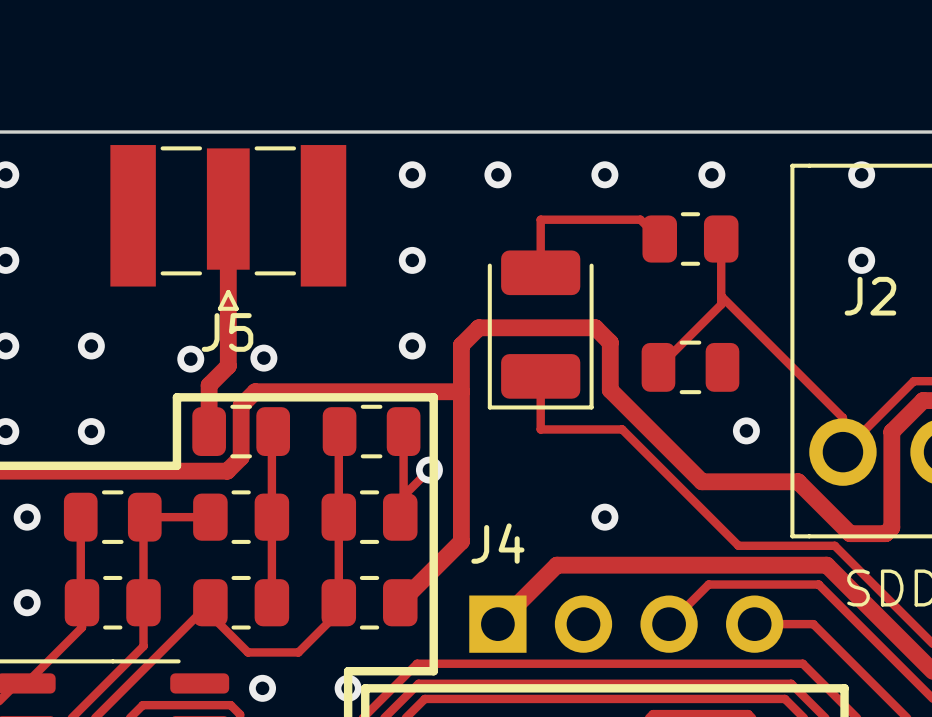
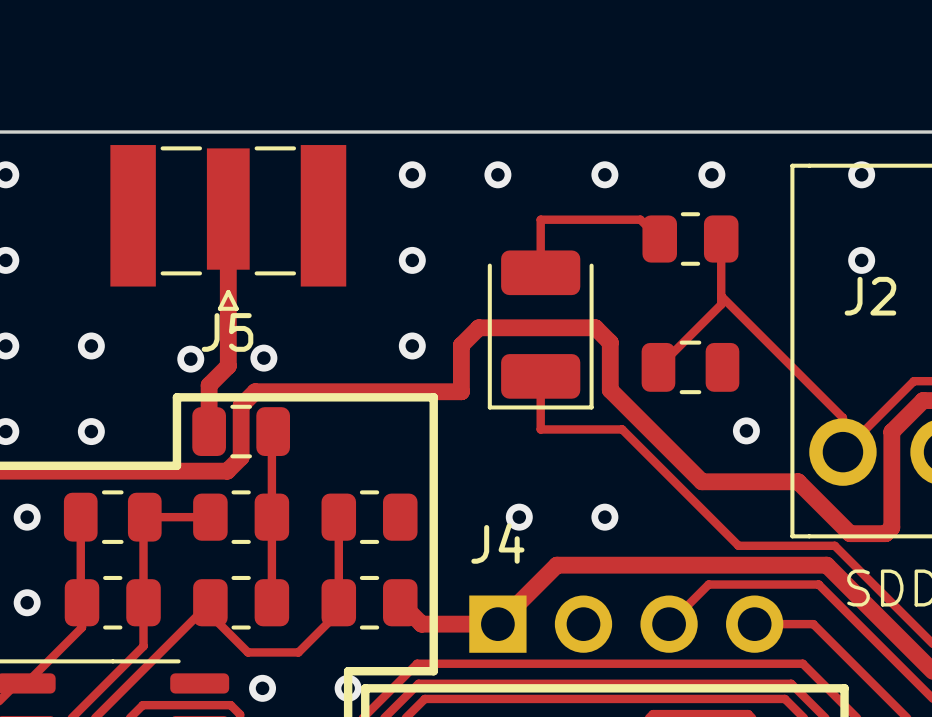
track: (461, 391) (461, 541) (400, 602) -> (497, 624) (421, 624) (400, 602)
track: (341, 431) (338, 434) (338, 517) -> none
part: (371, 431) -> none
track: (403, 431) (403, 513) (400, 517) (400, 499) (429, 470) -> none
via position: (429, 470) -> (519, 517)

